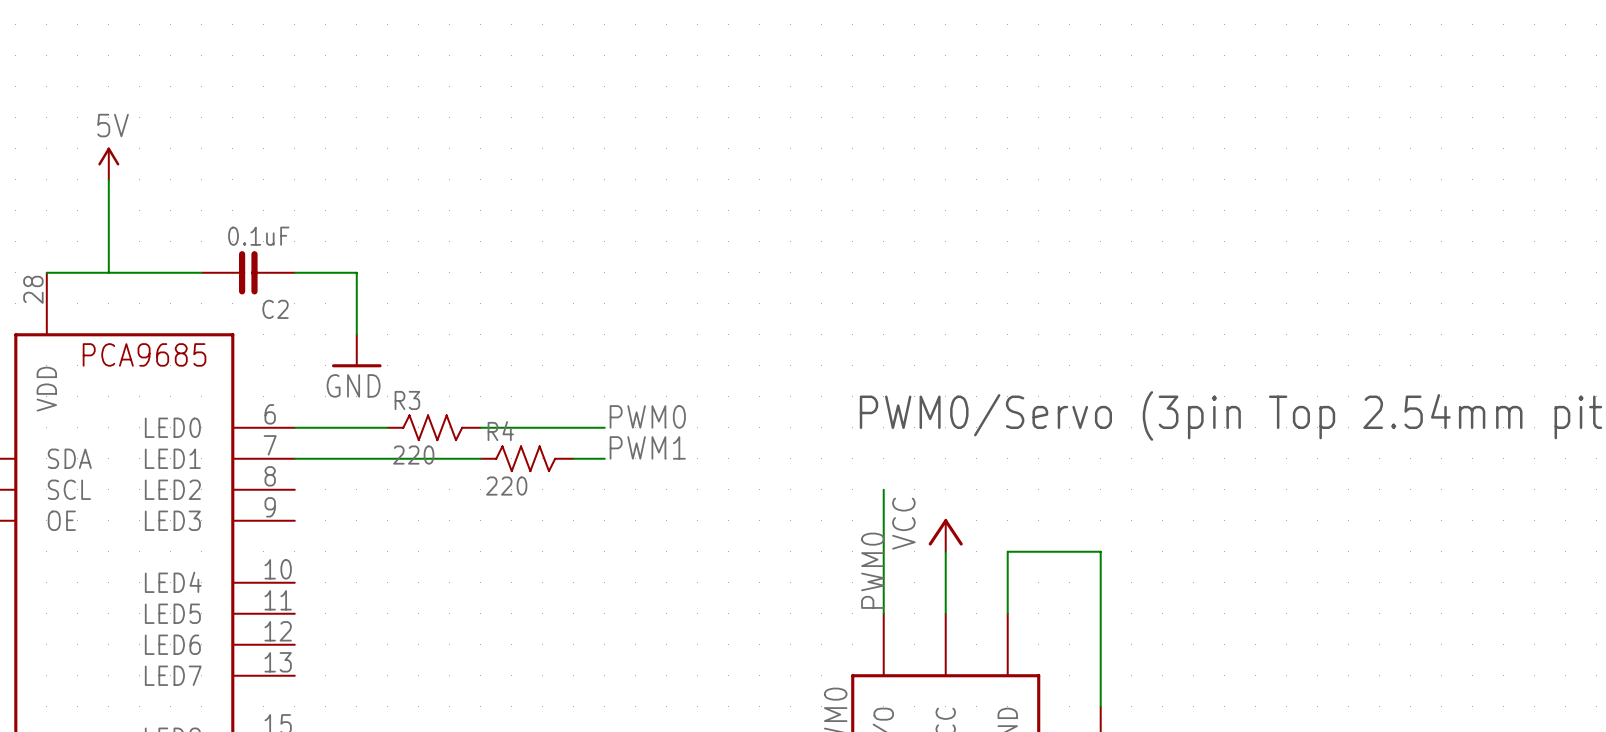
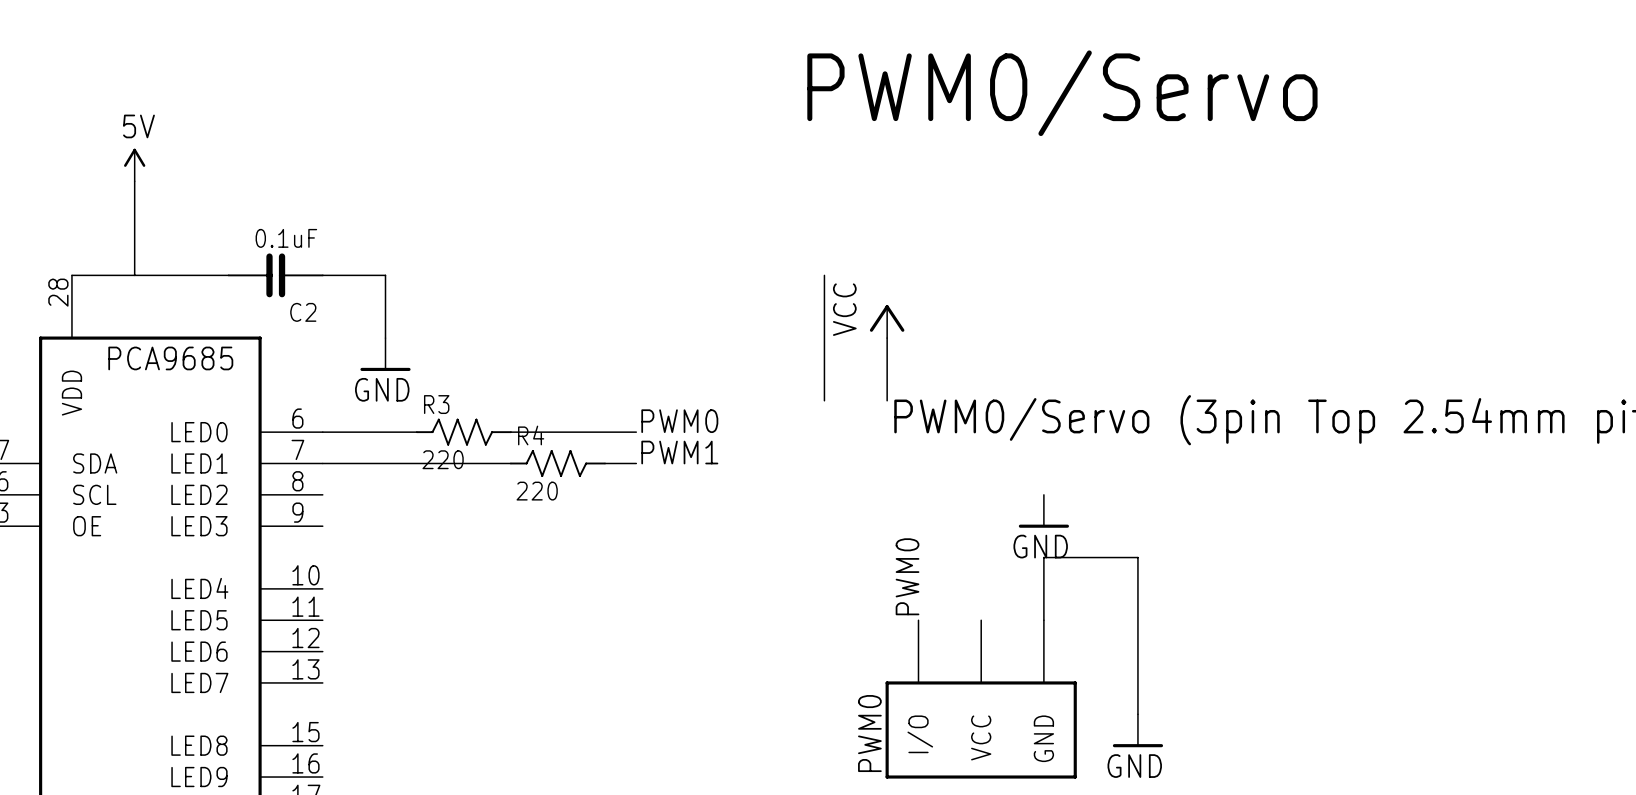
text: none -> PWM0/Servo (1062, 93)
wire: (883, 489) (883, 613) -> (824, 275) (824, 400)
power symbol: none -> GND (1043, 511)
power symbol position: VCC (945, 535) -> VCC (887, 321)
wire: (945, 551) (945, 613) -> (887, 338) (887, 400)

